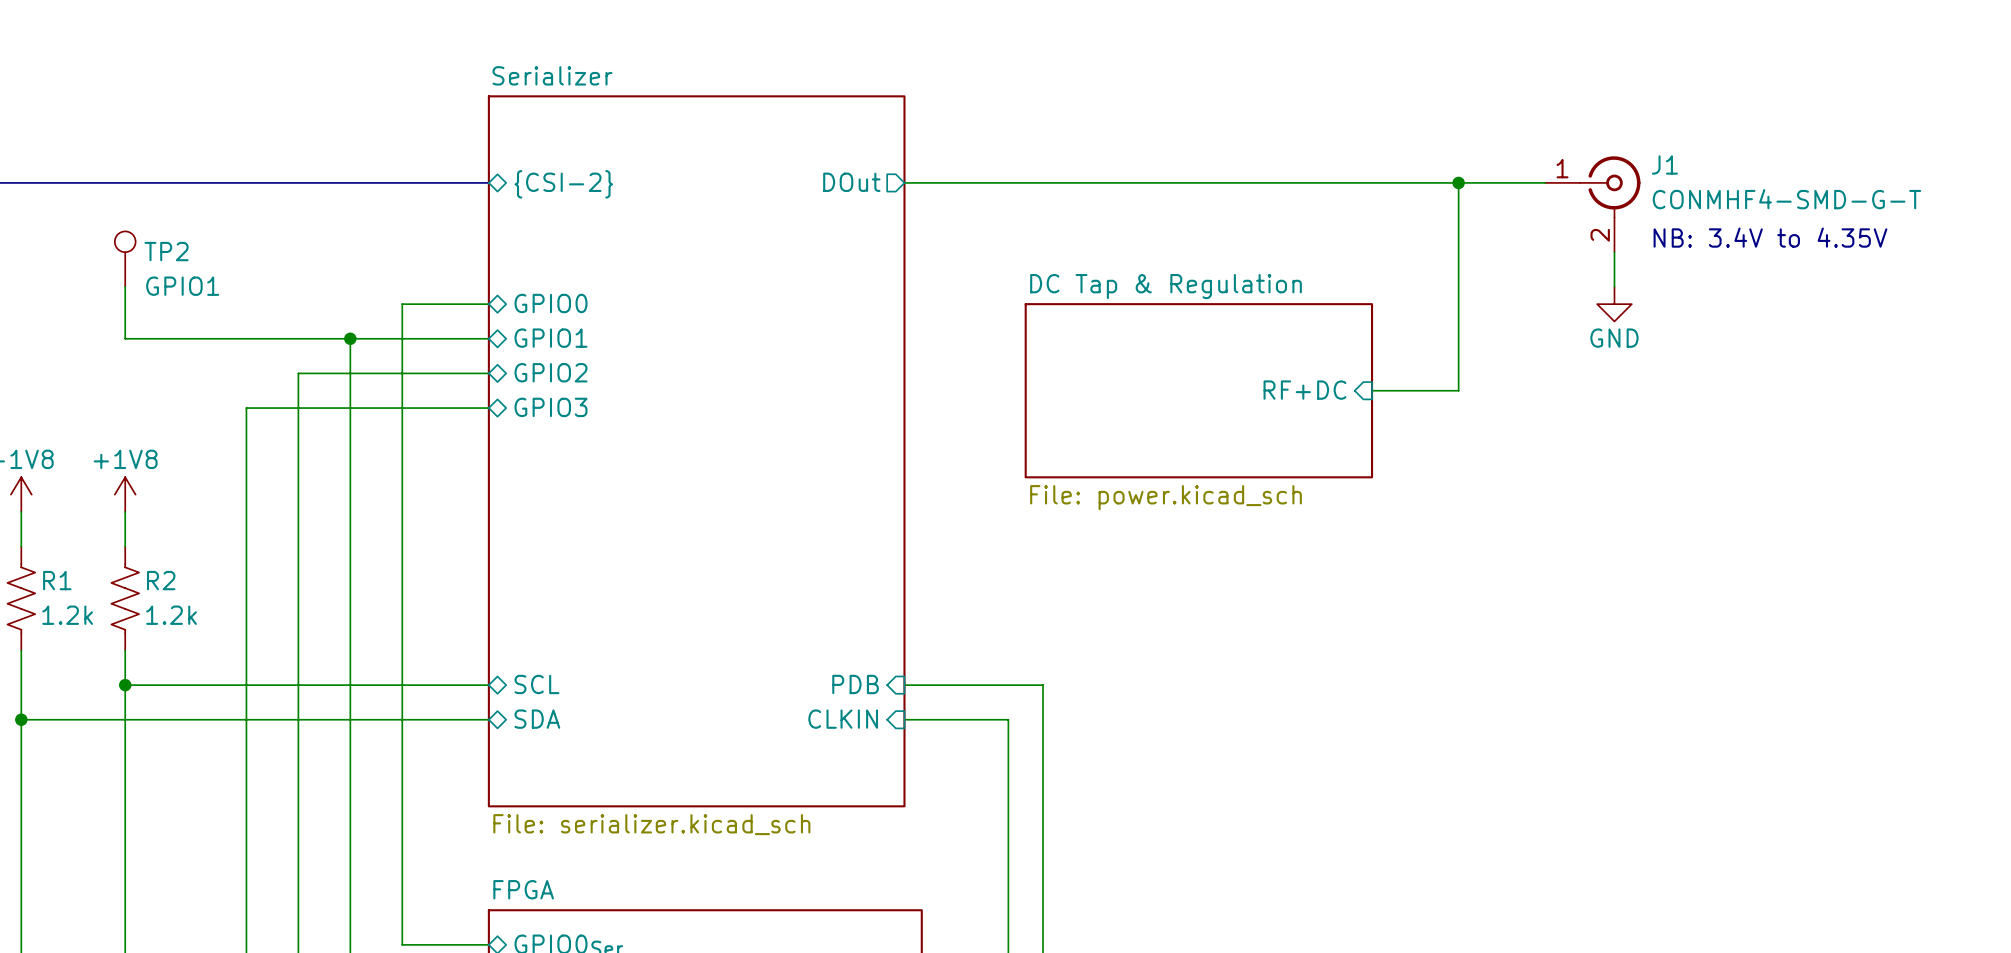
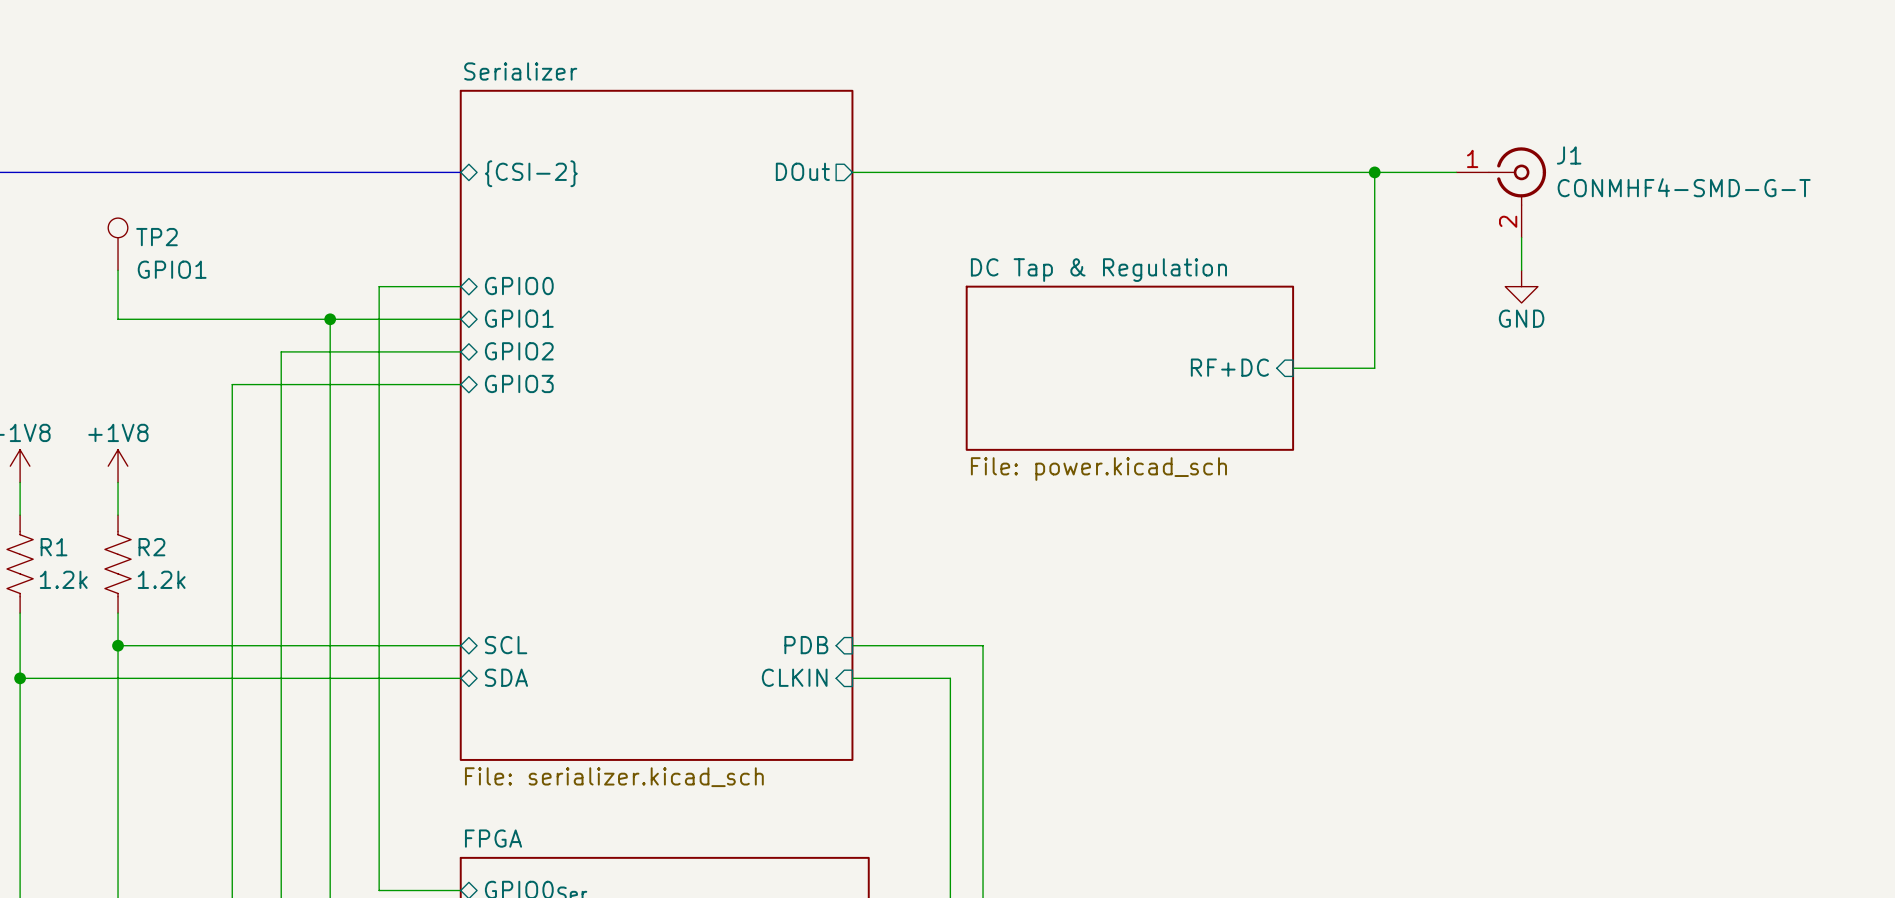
text: NB: 3.4V to 4.35V (1770, 237) -> none

